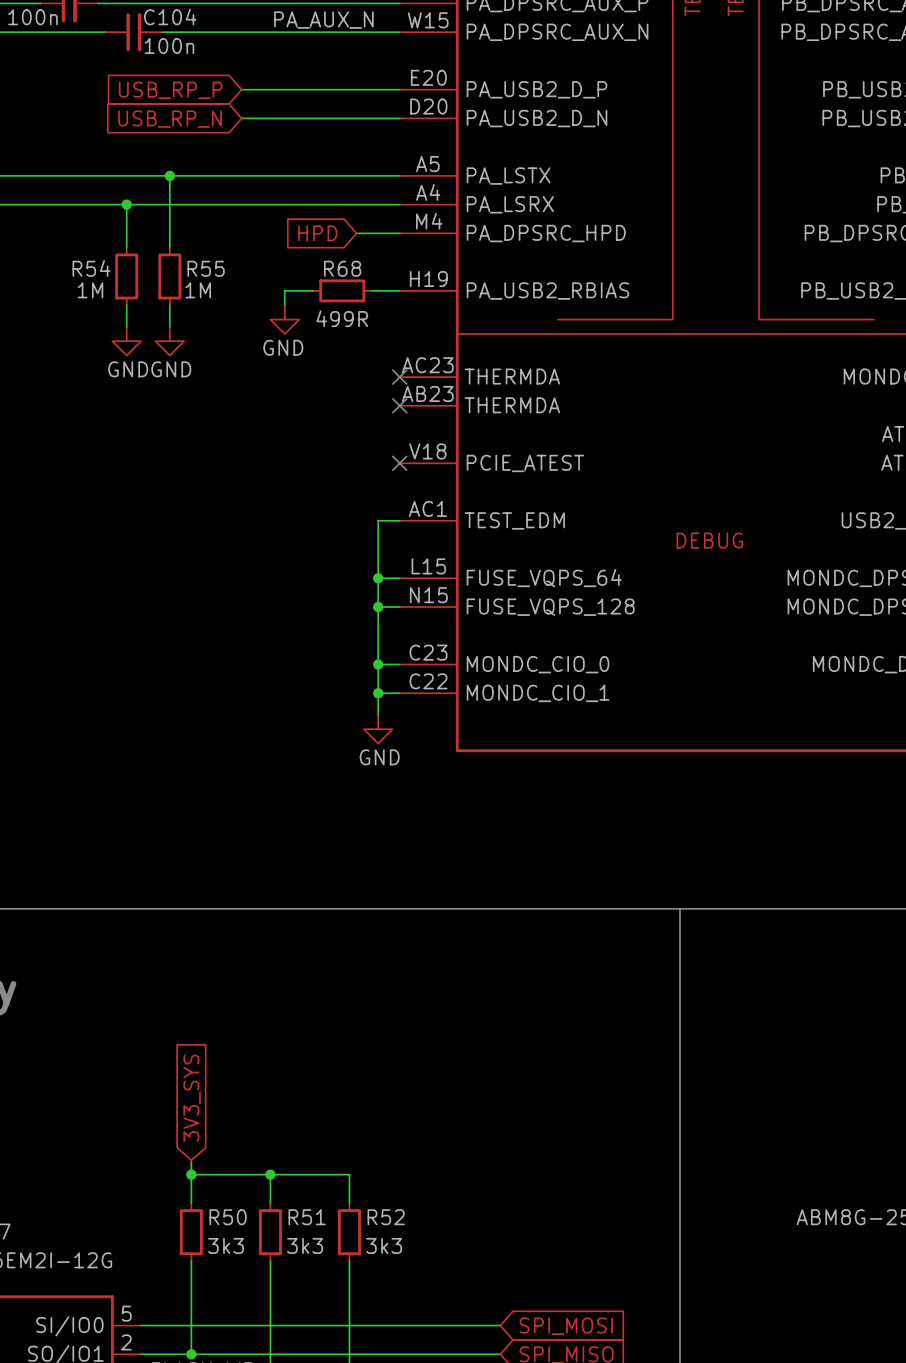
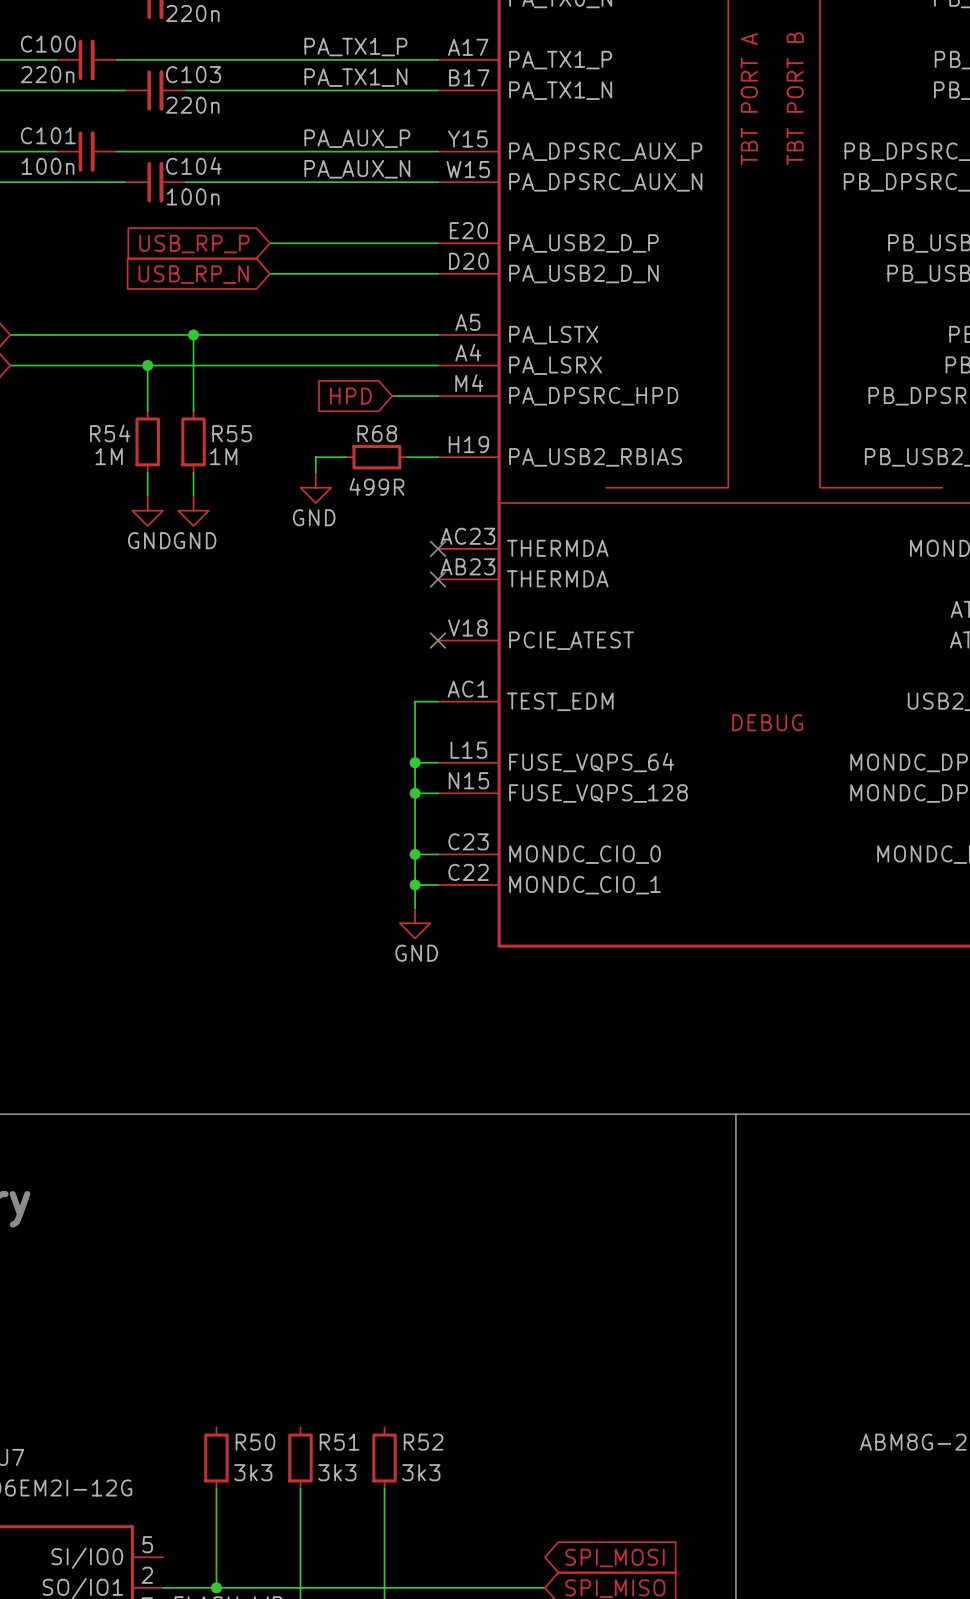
global label: 3V3_SYS (192, 1098) -> none
wire: (191, 1160) (191, 1203) -> none
wire: (191, 1174) (349, 1174) (349, 1203) -> none
junction: (191, 1174) -> none
wire: (270, 1174) (270, 1203) -> none
junction: (270, 1174) -> none
wire: (141, 1325) (500, 1325) -> none

